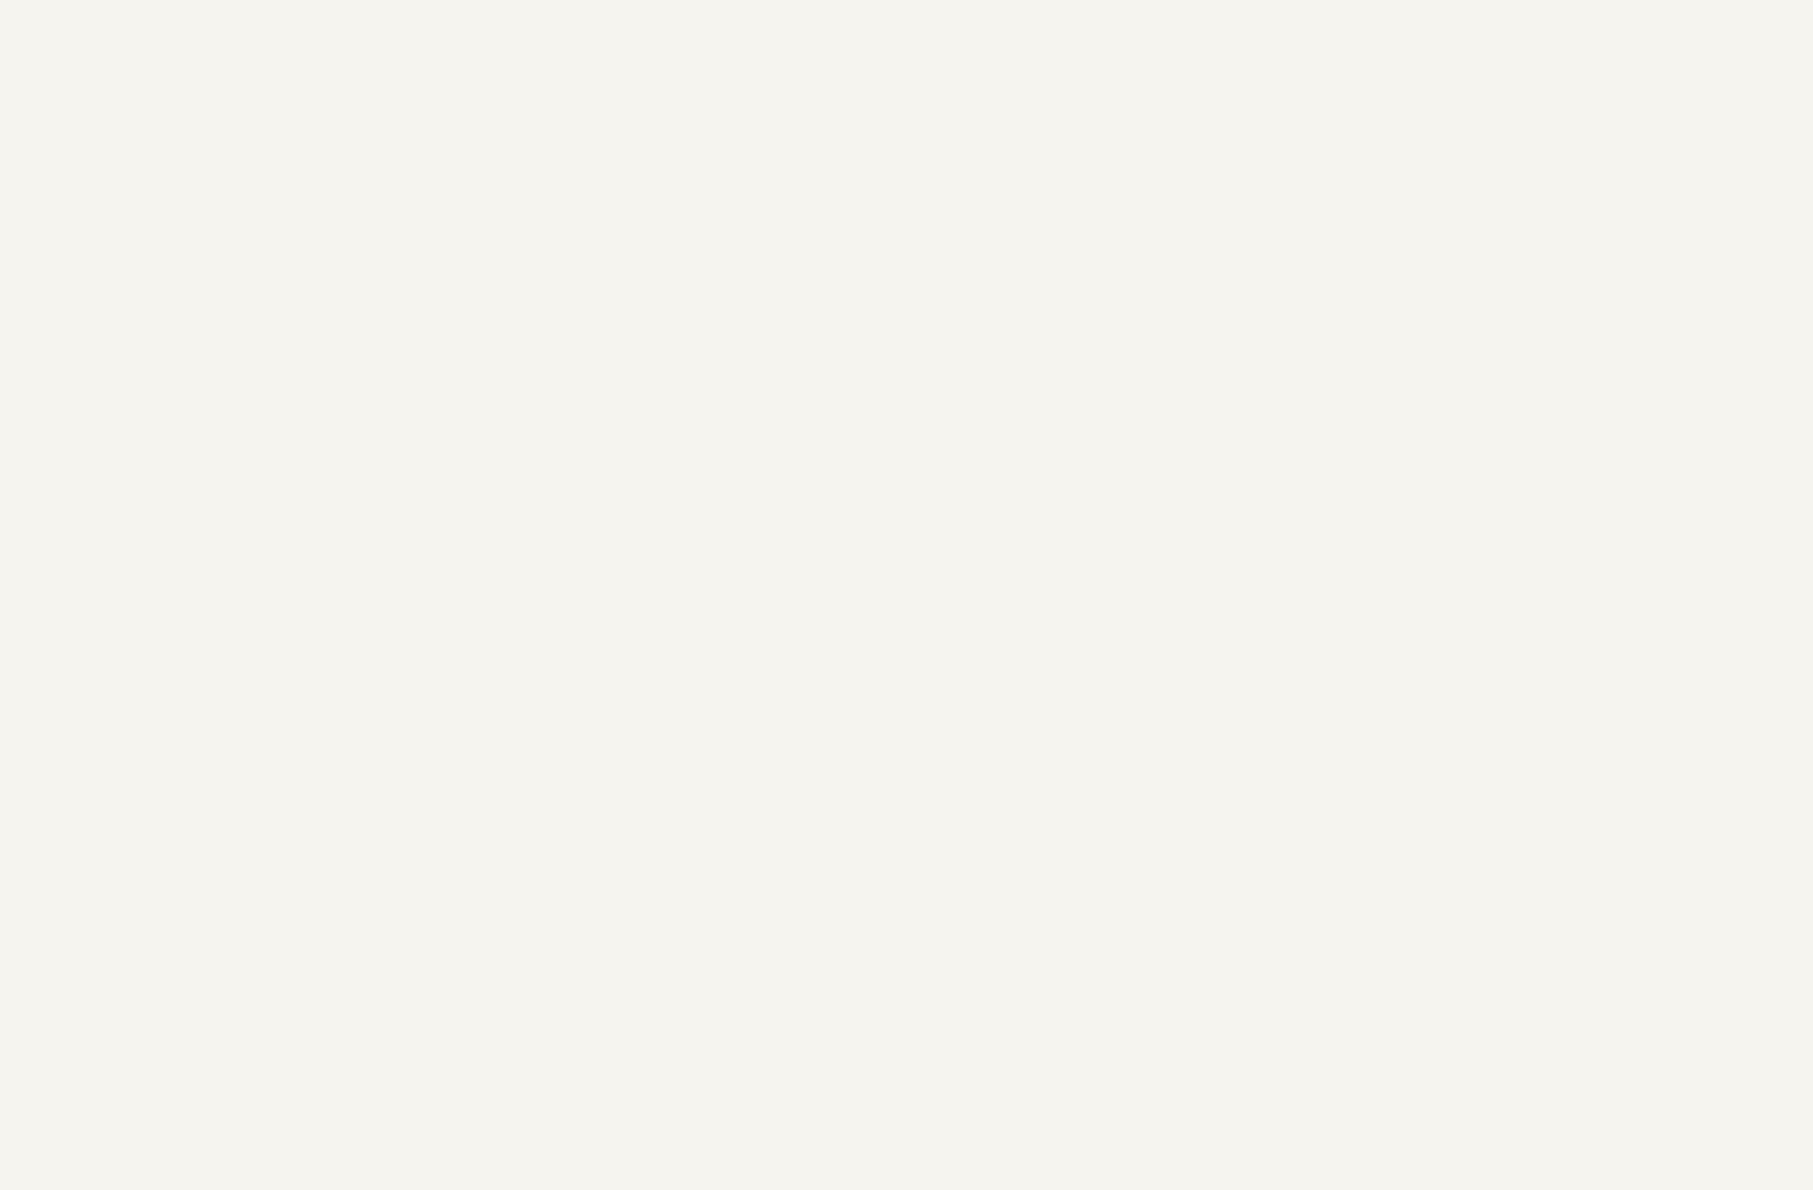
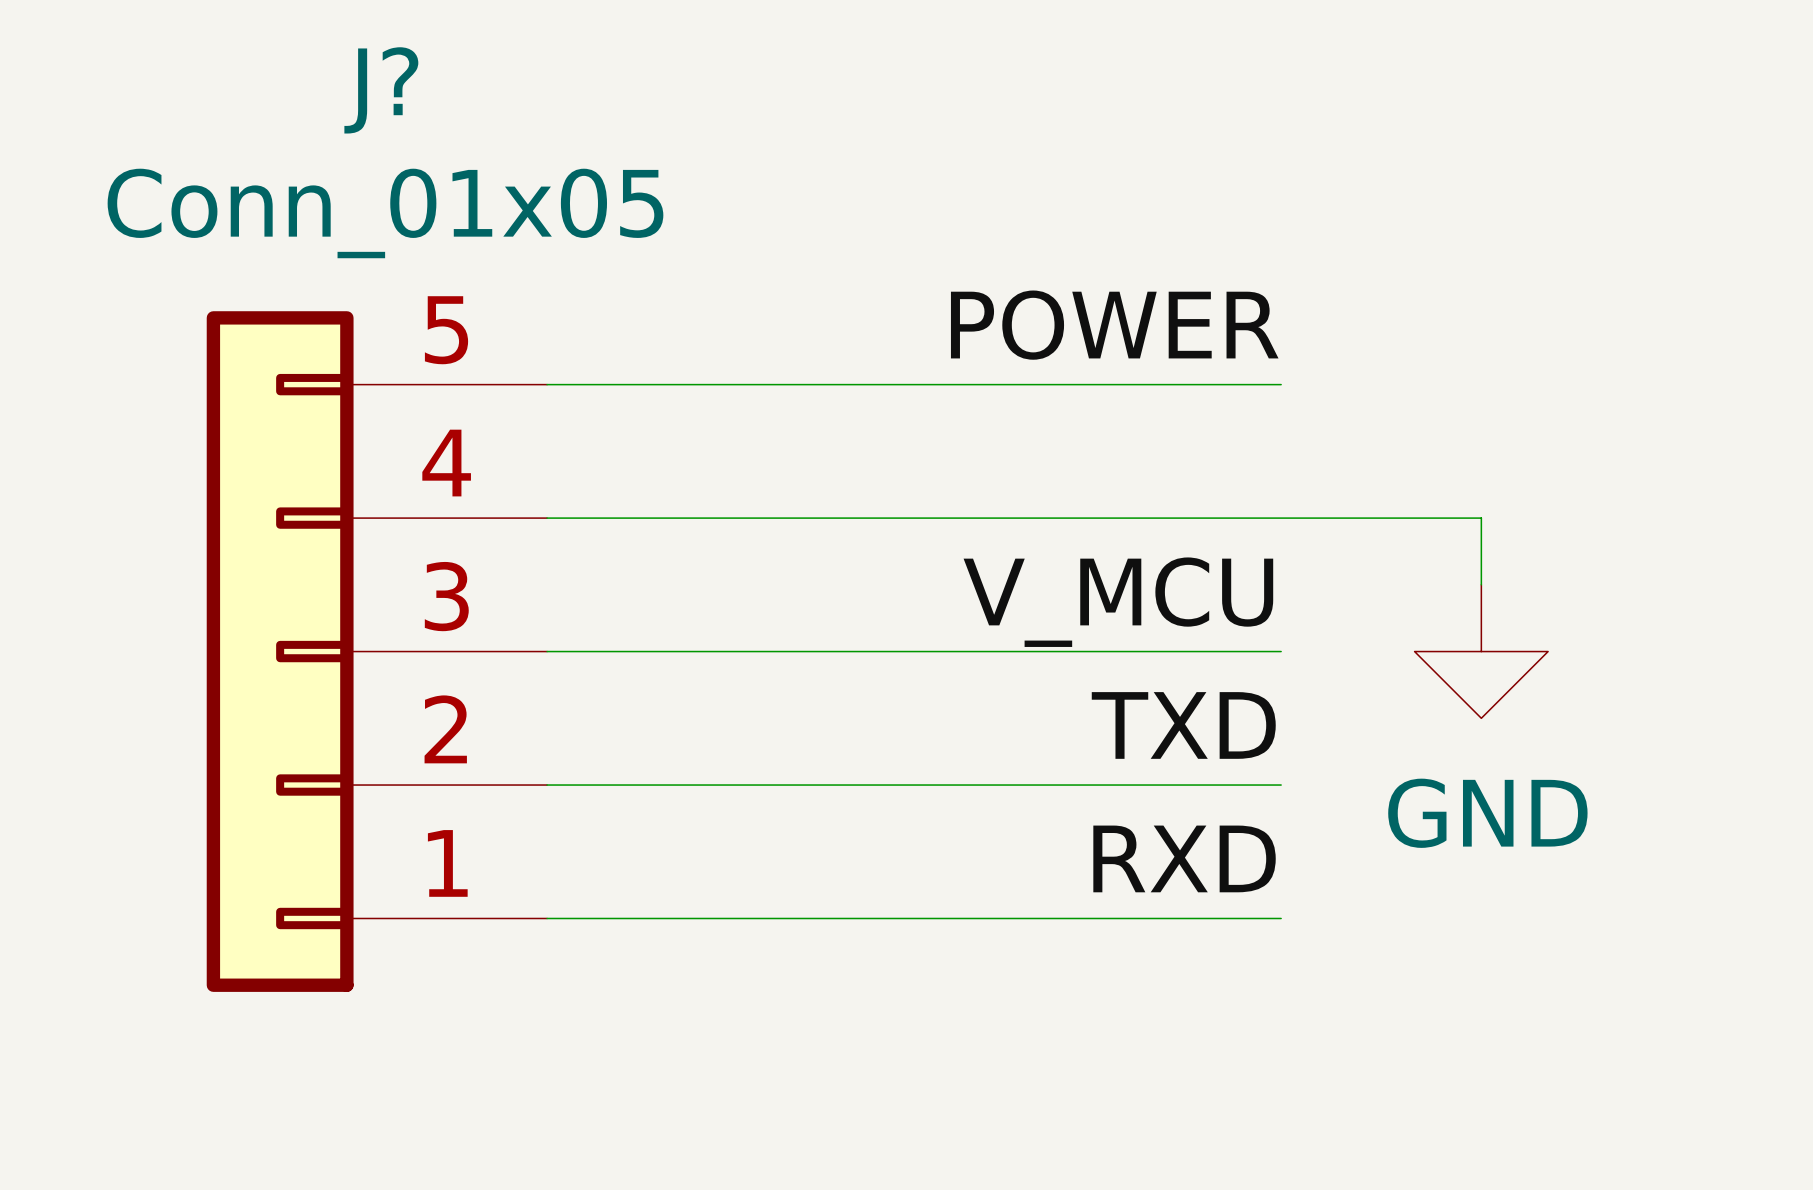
label: none -> POWER (1114, 325)
wire: none -> (547, 384) (1281, 384)
wire: none -> (547, 518) (1481, 518) (1481, 584)
label: none -> V_MCU (1118, 602)
J?: none -> Conn_01x05 (376, 651)
wire: none -> (547, 651) (1281, 651)
power symbol: none -> GND (1481, 651)
label: none -> TXD (1183, 725)
wire: none -> (547, 785) (1281, 785)
label: none -> RXD (1184, 858)
wire: none -> (547, 918) (1281, 918)

